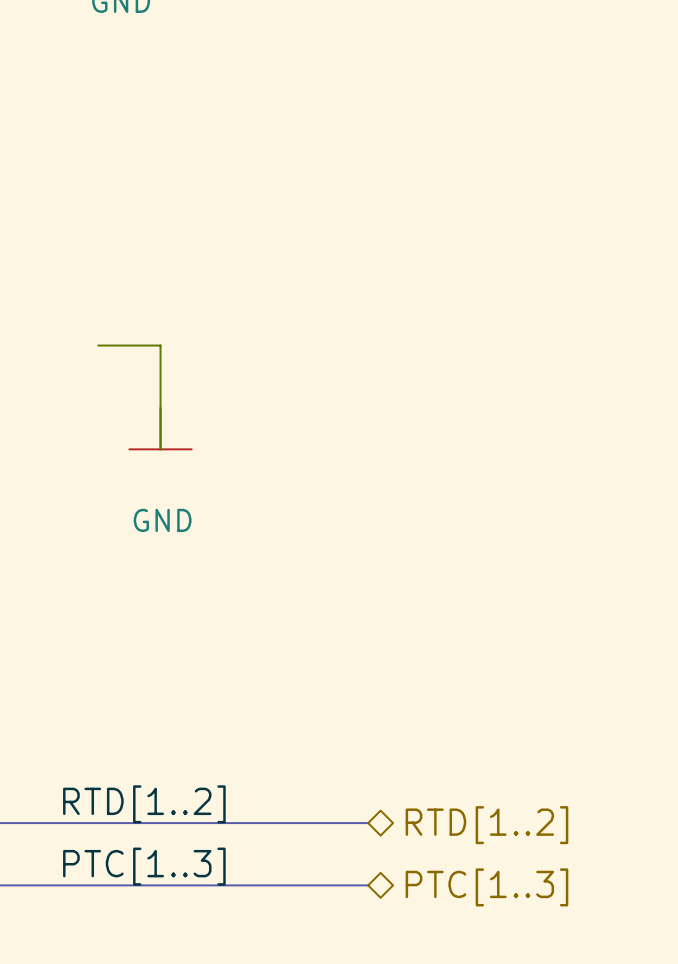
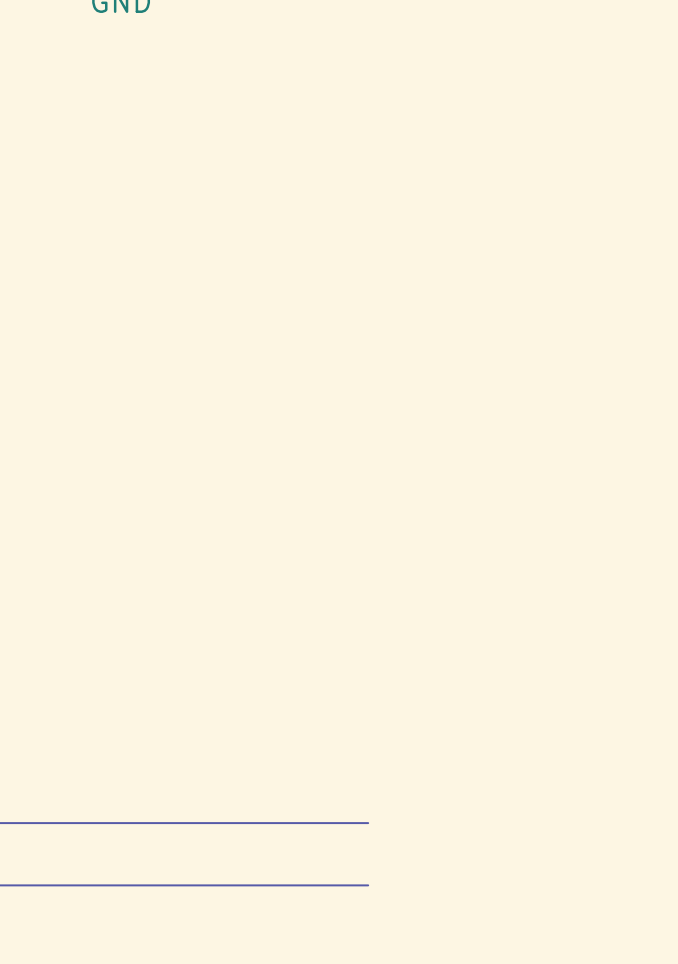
wire: (98, 345) (160, 345) (160, 449) -> none
power symbol: GND (160, 428) -> none
label: RTD[1..2] (144, 804) -> none
hierarchical label: RTD[1..2] (486, 825) -> none
label: PTC[1..3] (144, 866) -> none
hierarchical label: PTC[1..3] (486, 887) -> none

